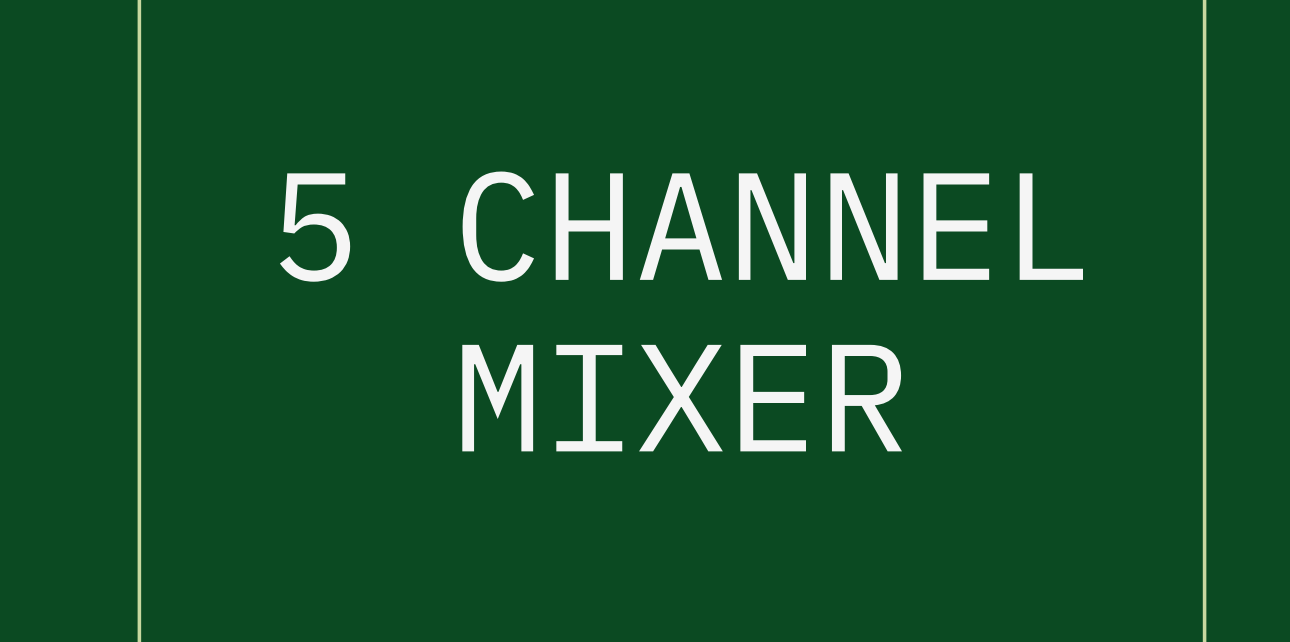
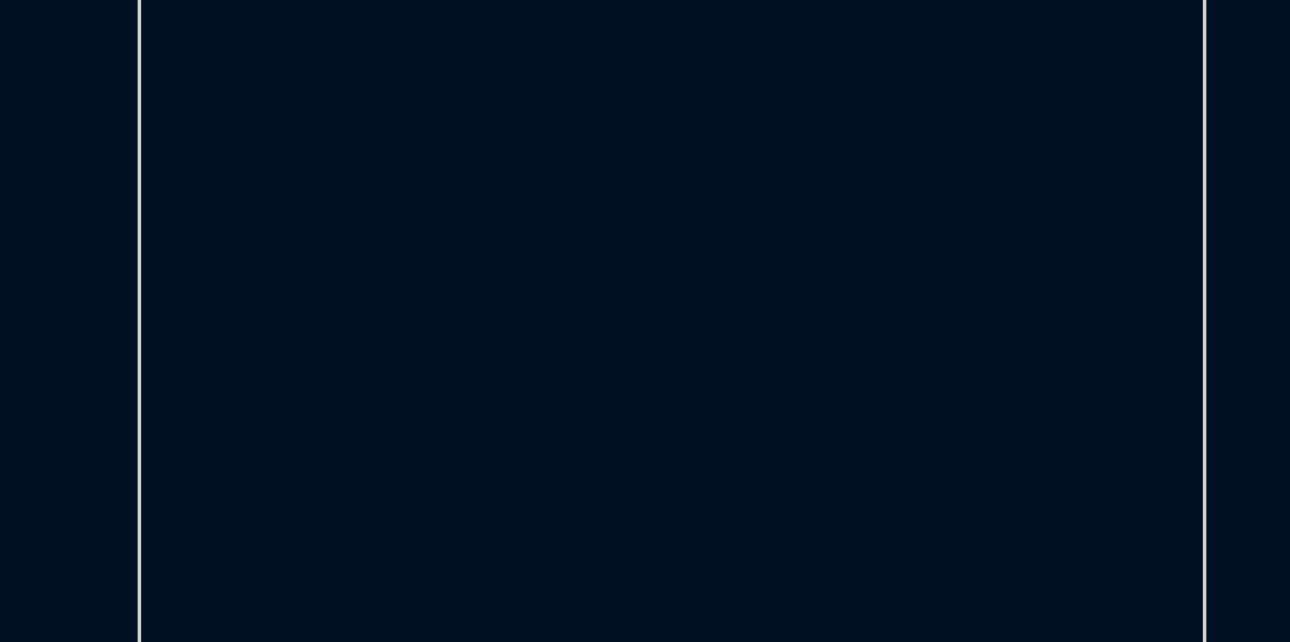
text: 5 CHANNEL (681, 226) -> none
text: MIXER (682, 398) -> none

